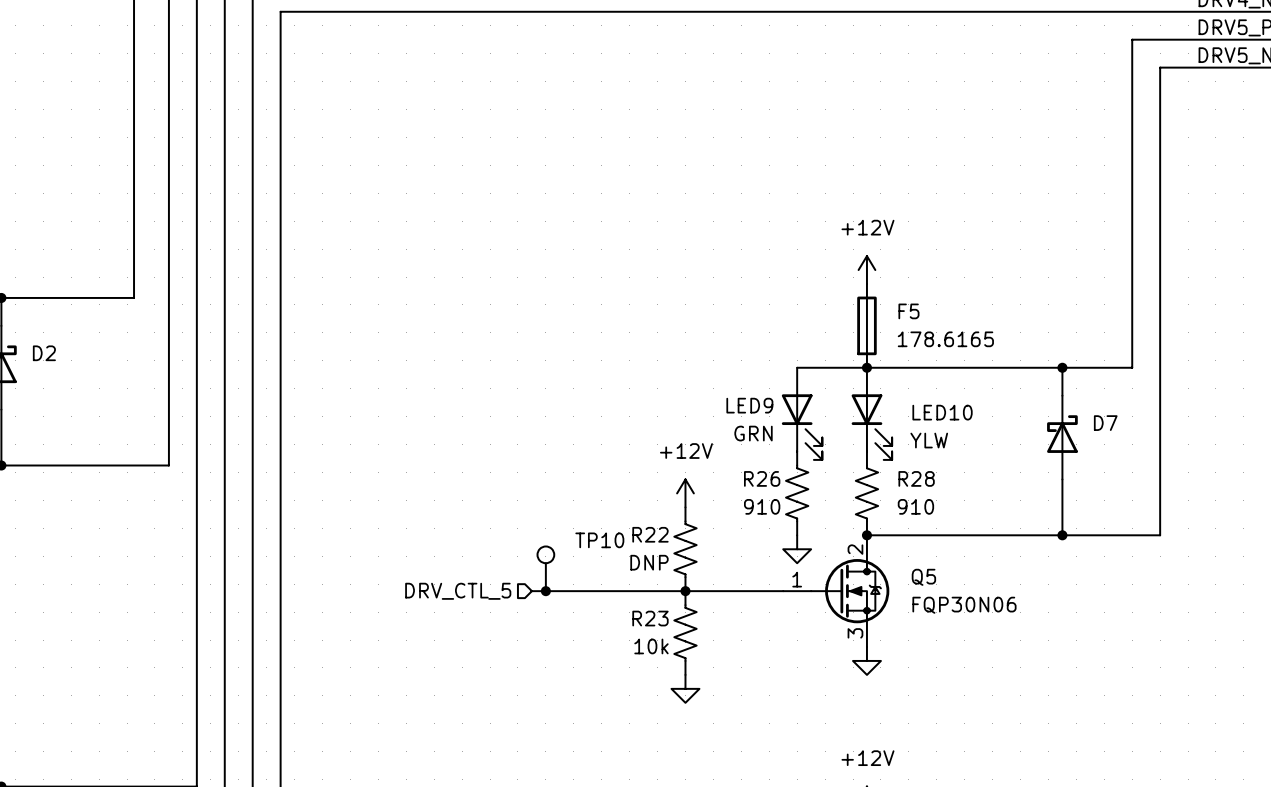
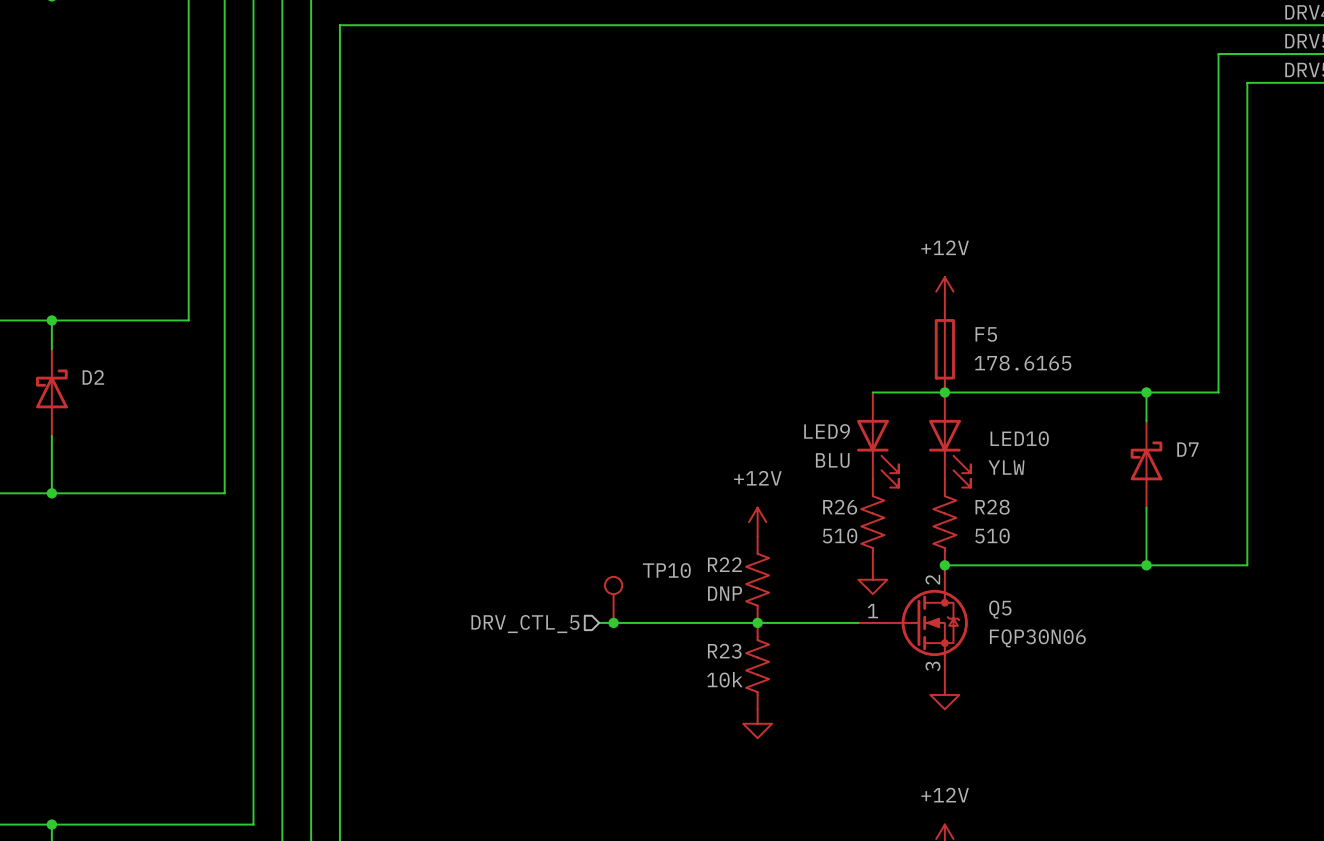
LED9 value: GRN (753, 433) -> BLU (832, 460)
R26 value: 910 (762, 506) -> 510 (840, 535)
R28 value: 910 (915, 506) -> 510 (992, 535)

